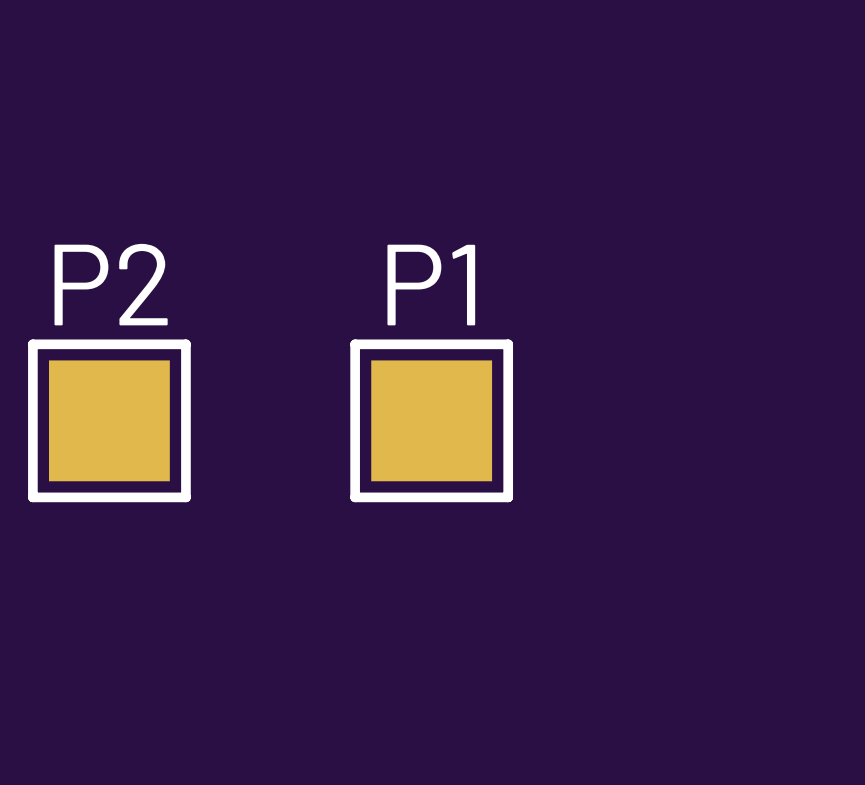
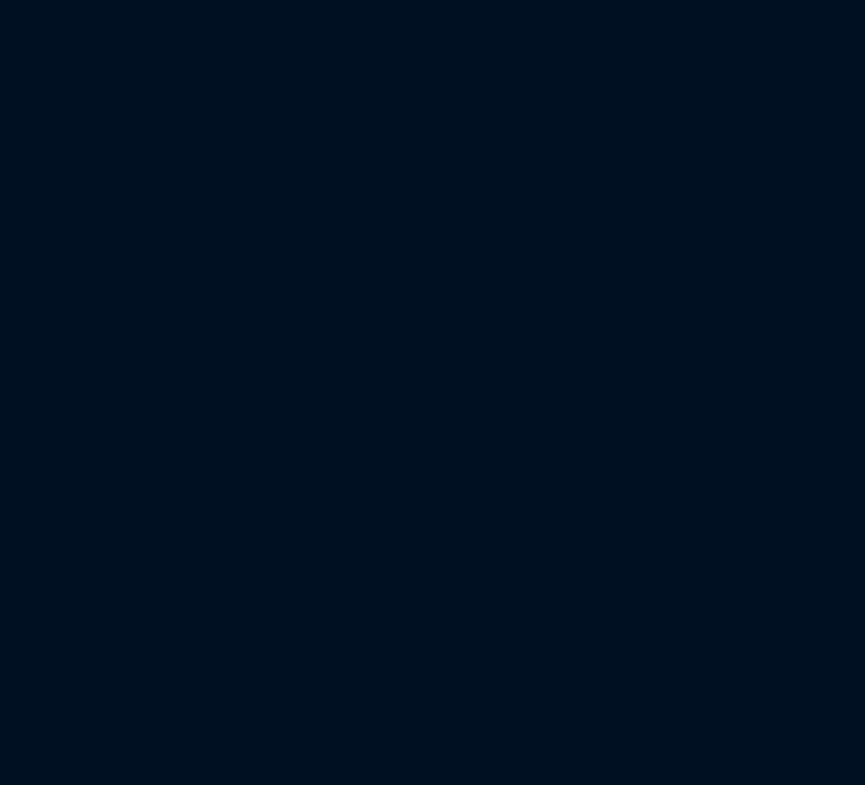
P2: (109, 420) -> none
P1: (431, 420) -> none

